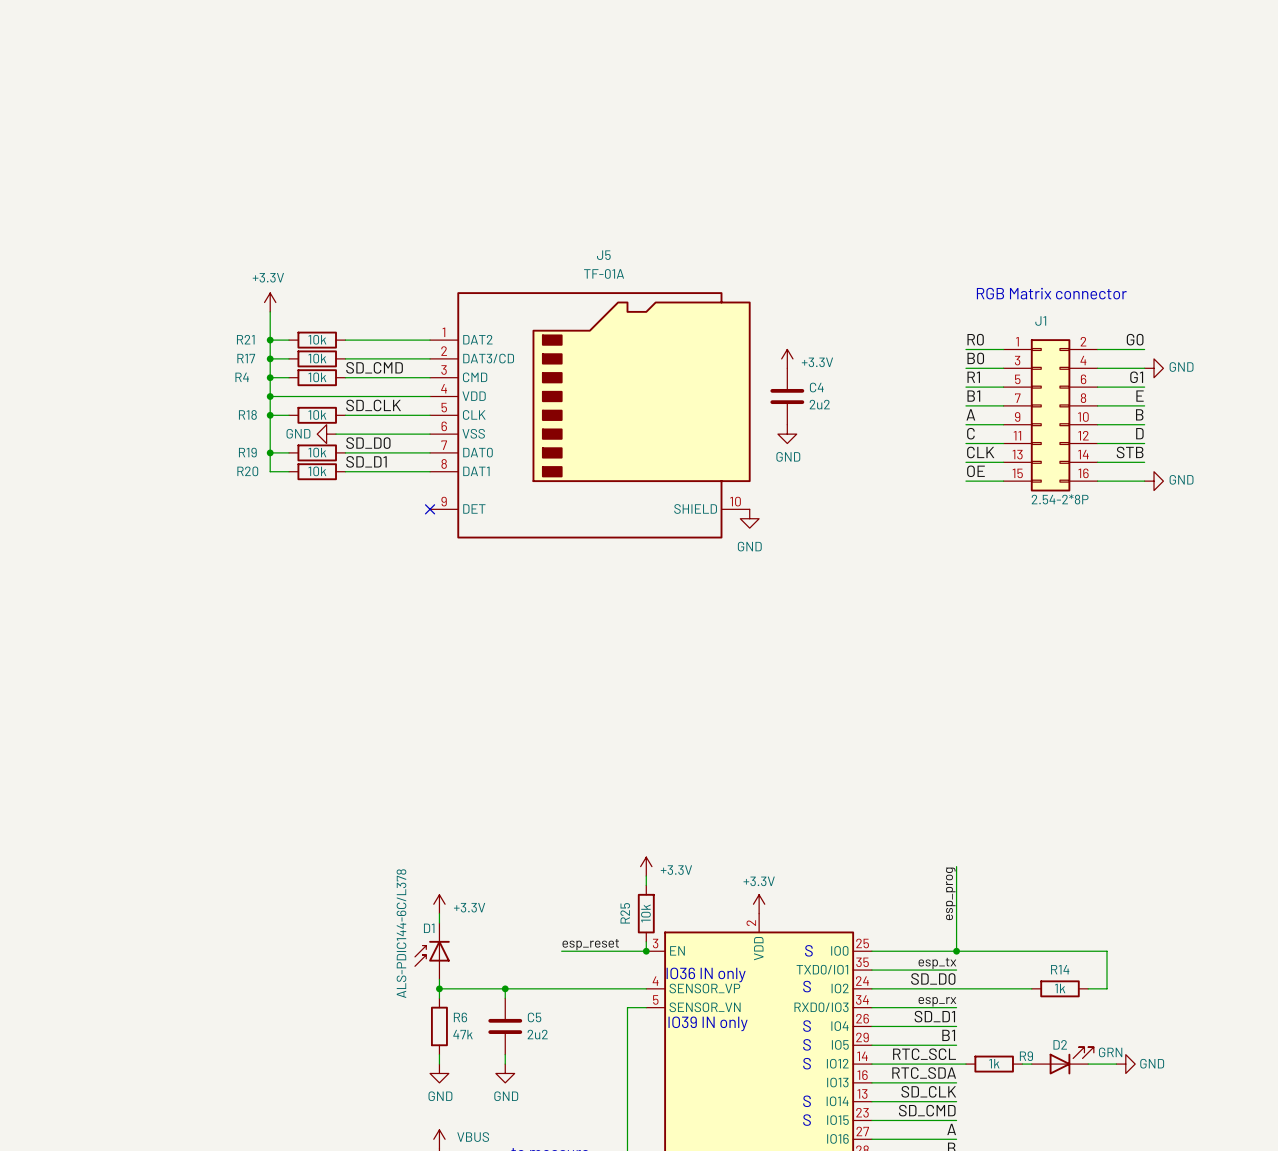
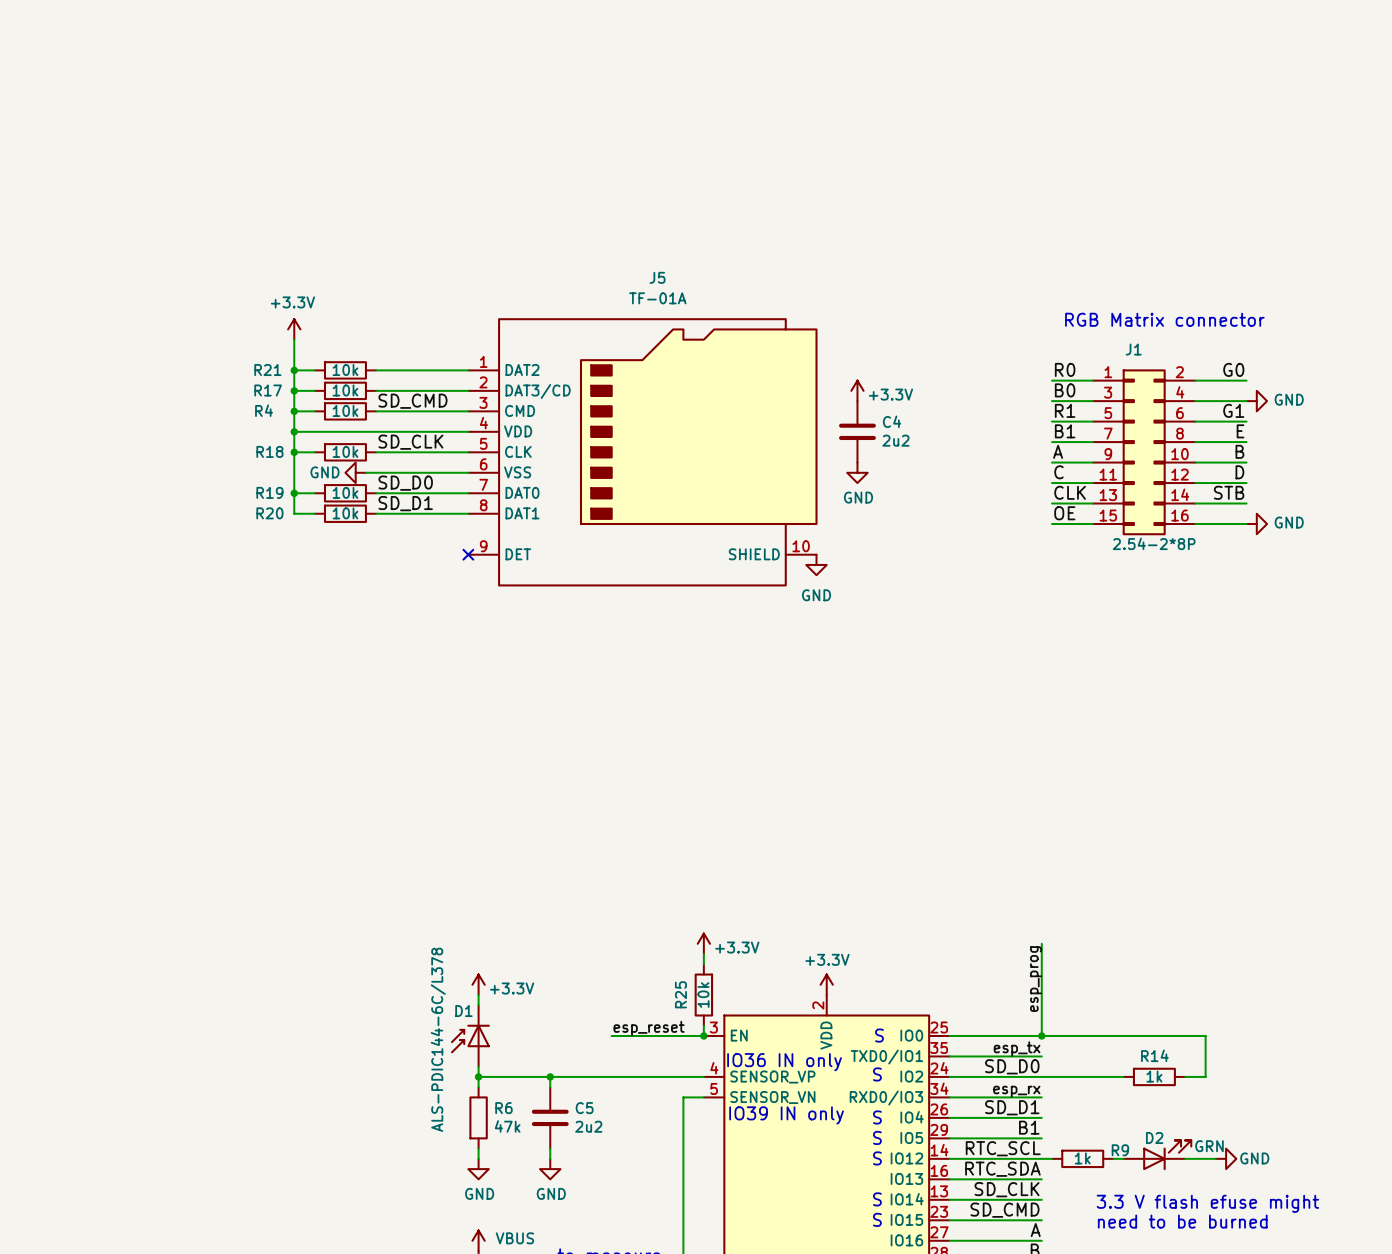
text: none -> 3.3 V flash efuse might (1207, 1203)
text: none -> need to be burned (1182, 1221)

